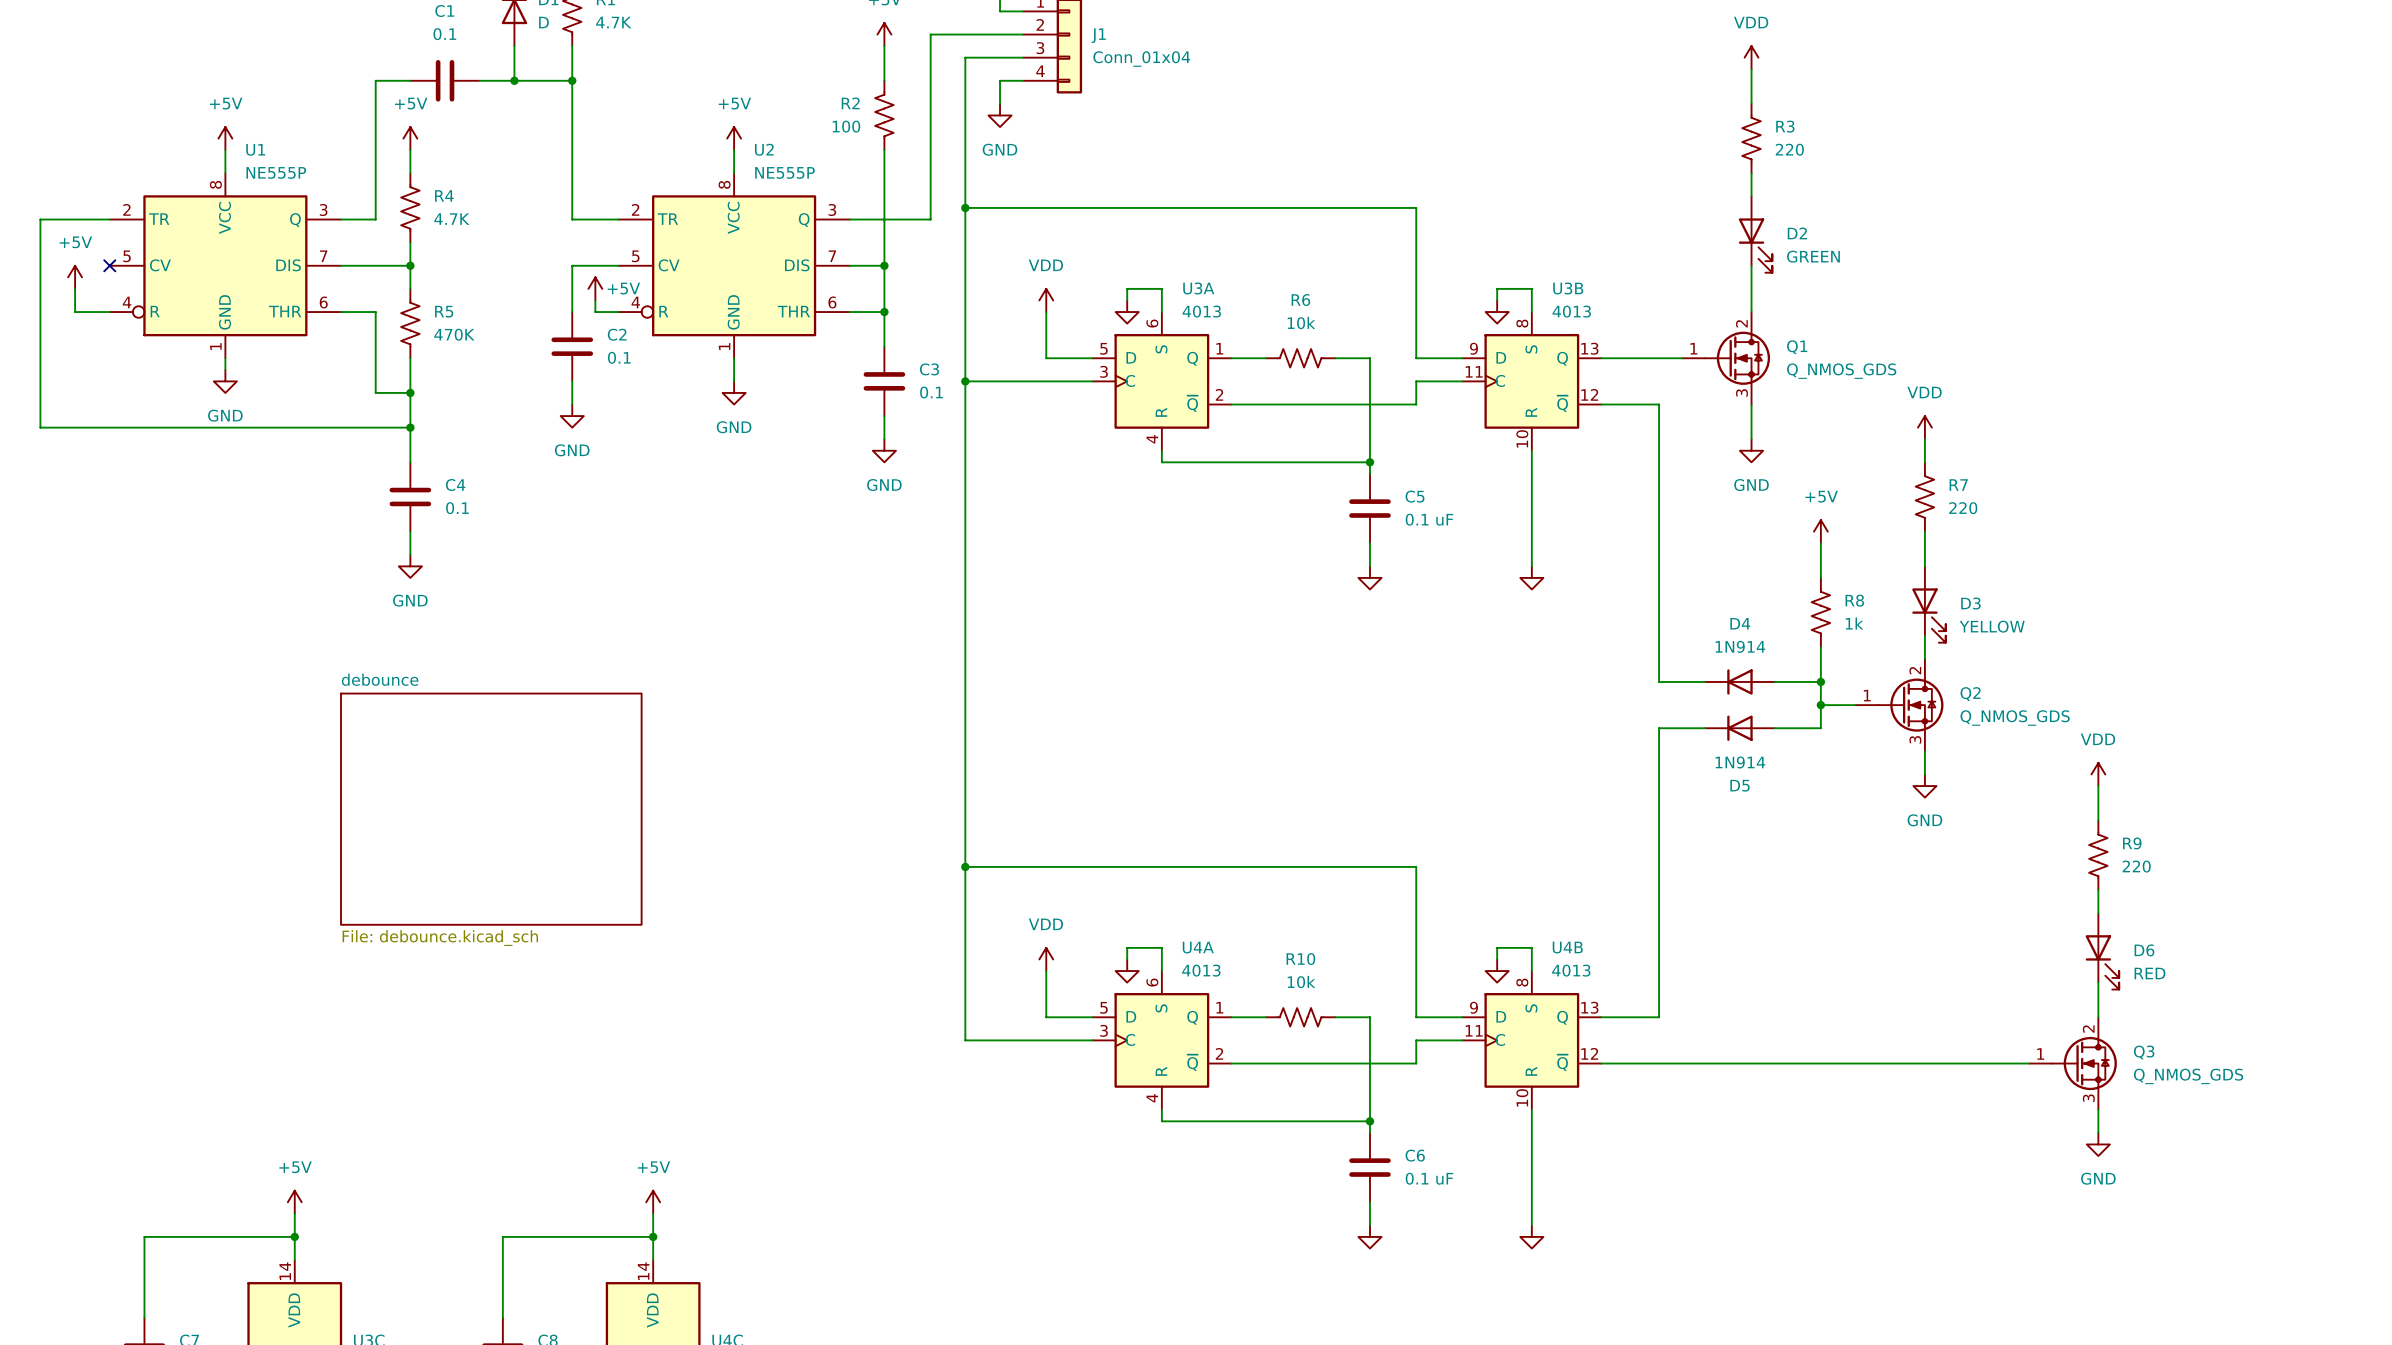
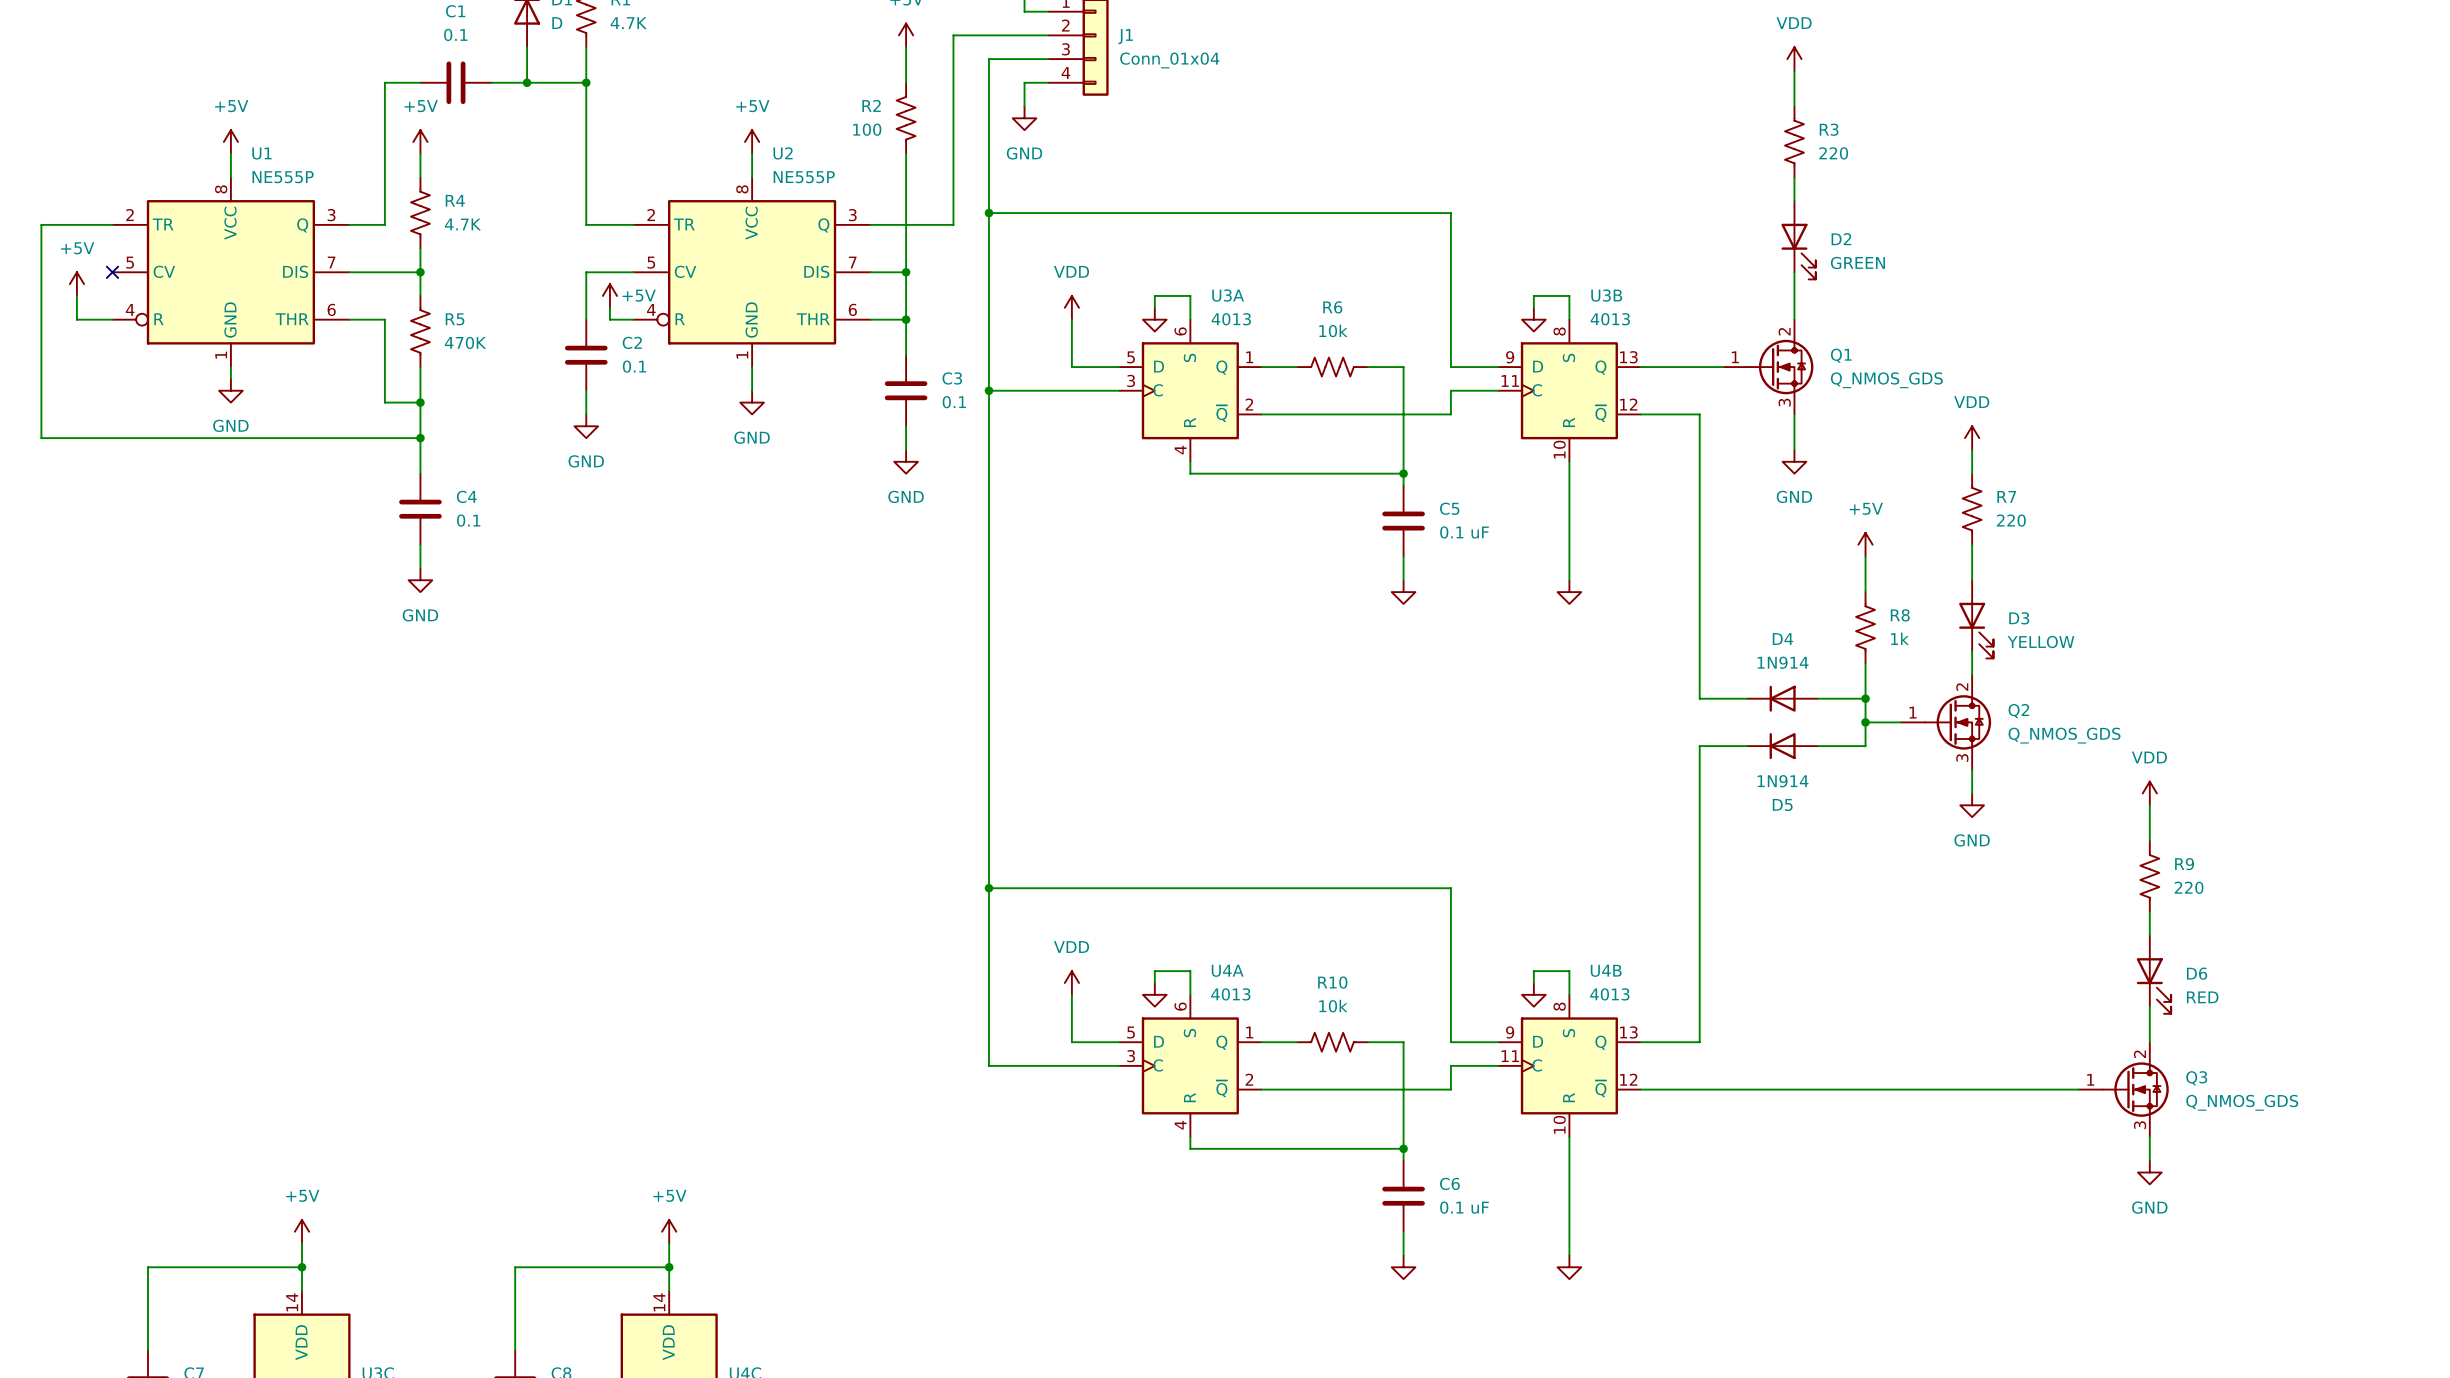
sheet debounce: File: debounce.kicad_sch (491, 809) -> none

